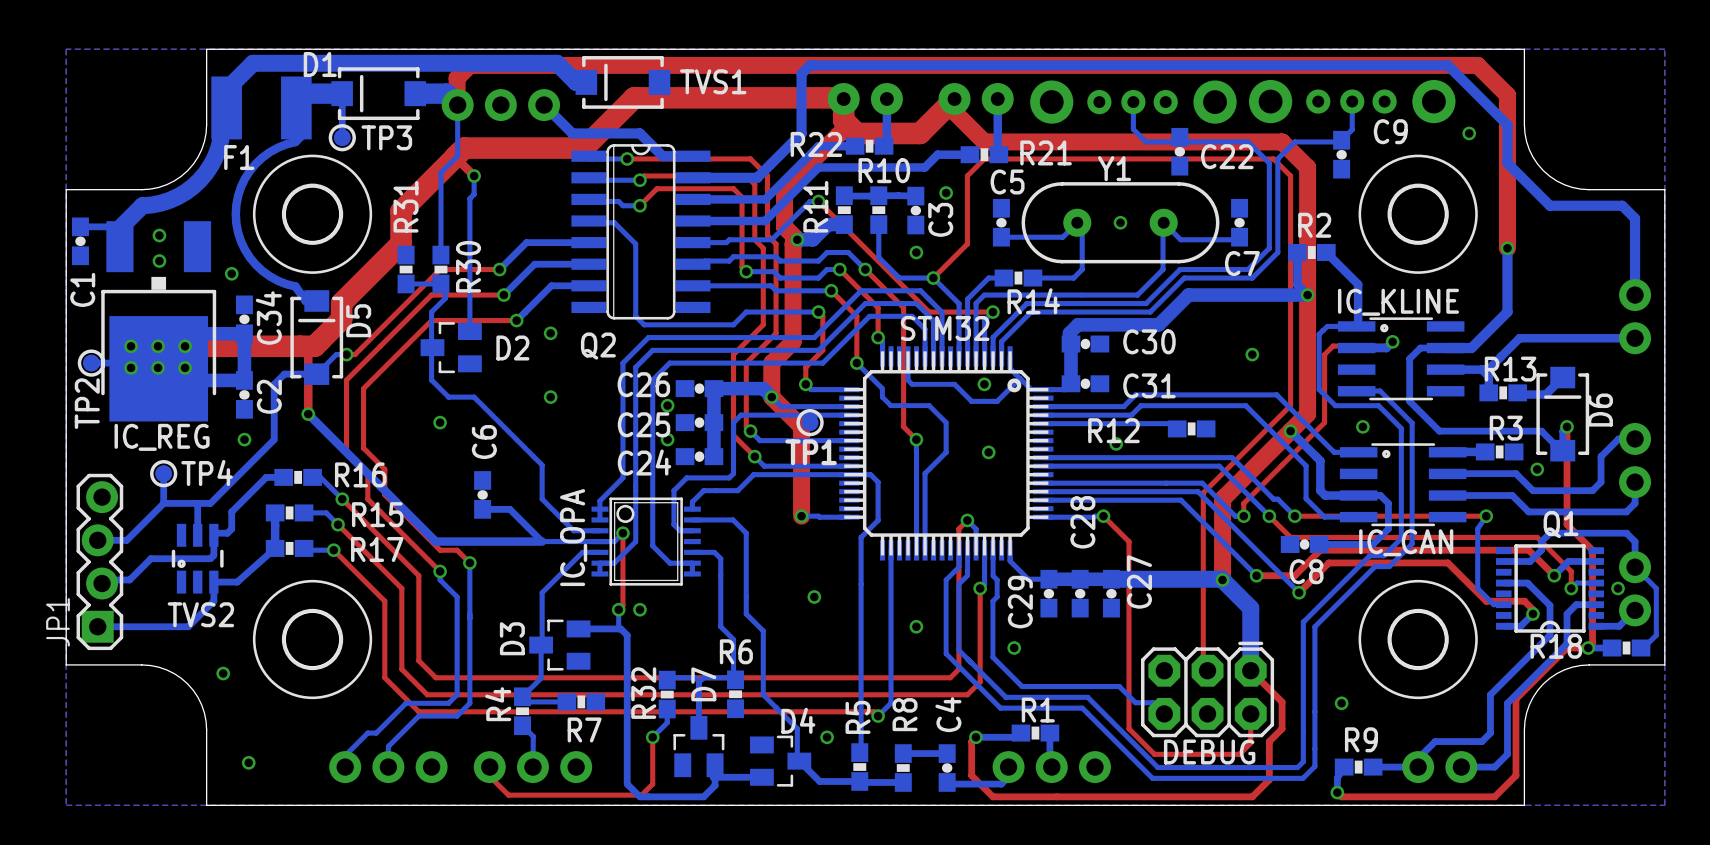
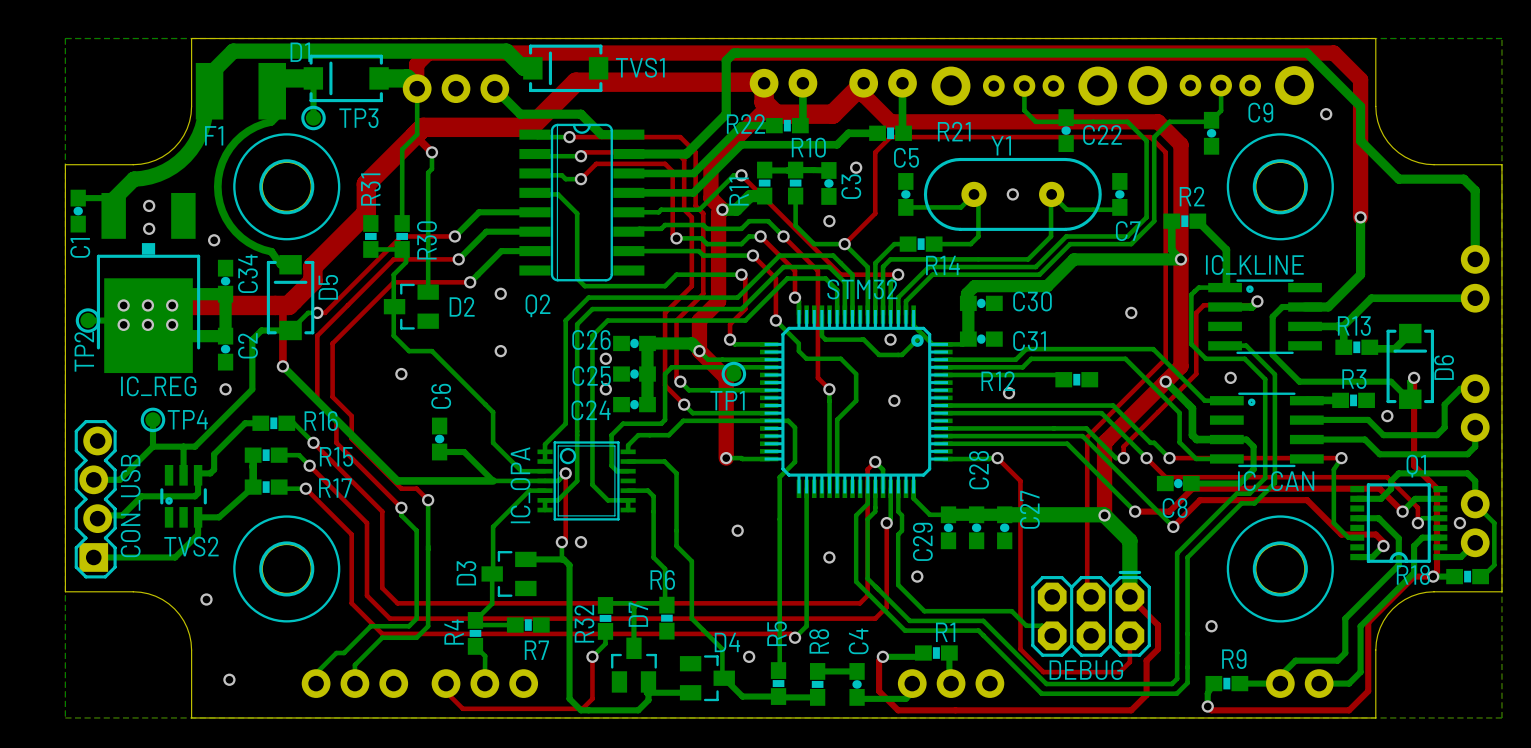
JP1 name: JP1 (57, 622) -> CON_USB (130, 505)

